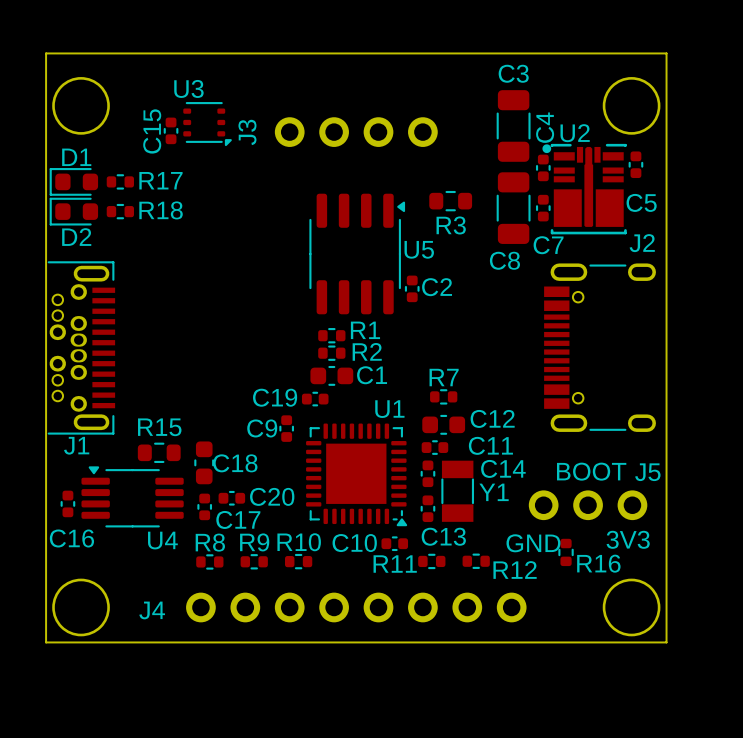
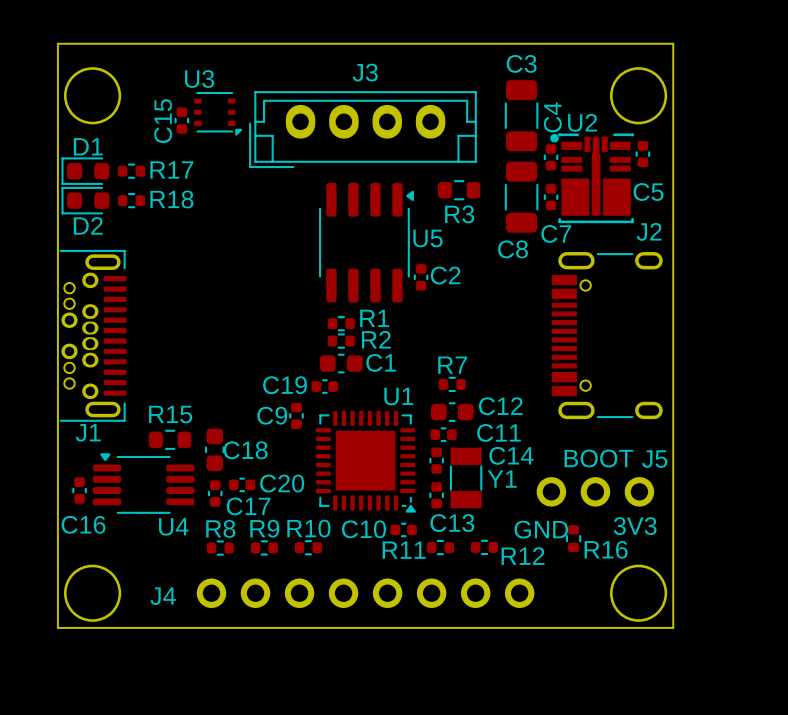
J3 footprint: [274, 117, 438, 147] -> [249, 91, 477, 169]
J3 name position: J3 (247, 132) -> J3 (365, 72)

